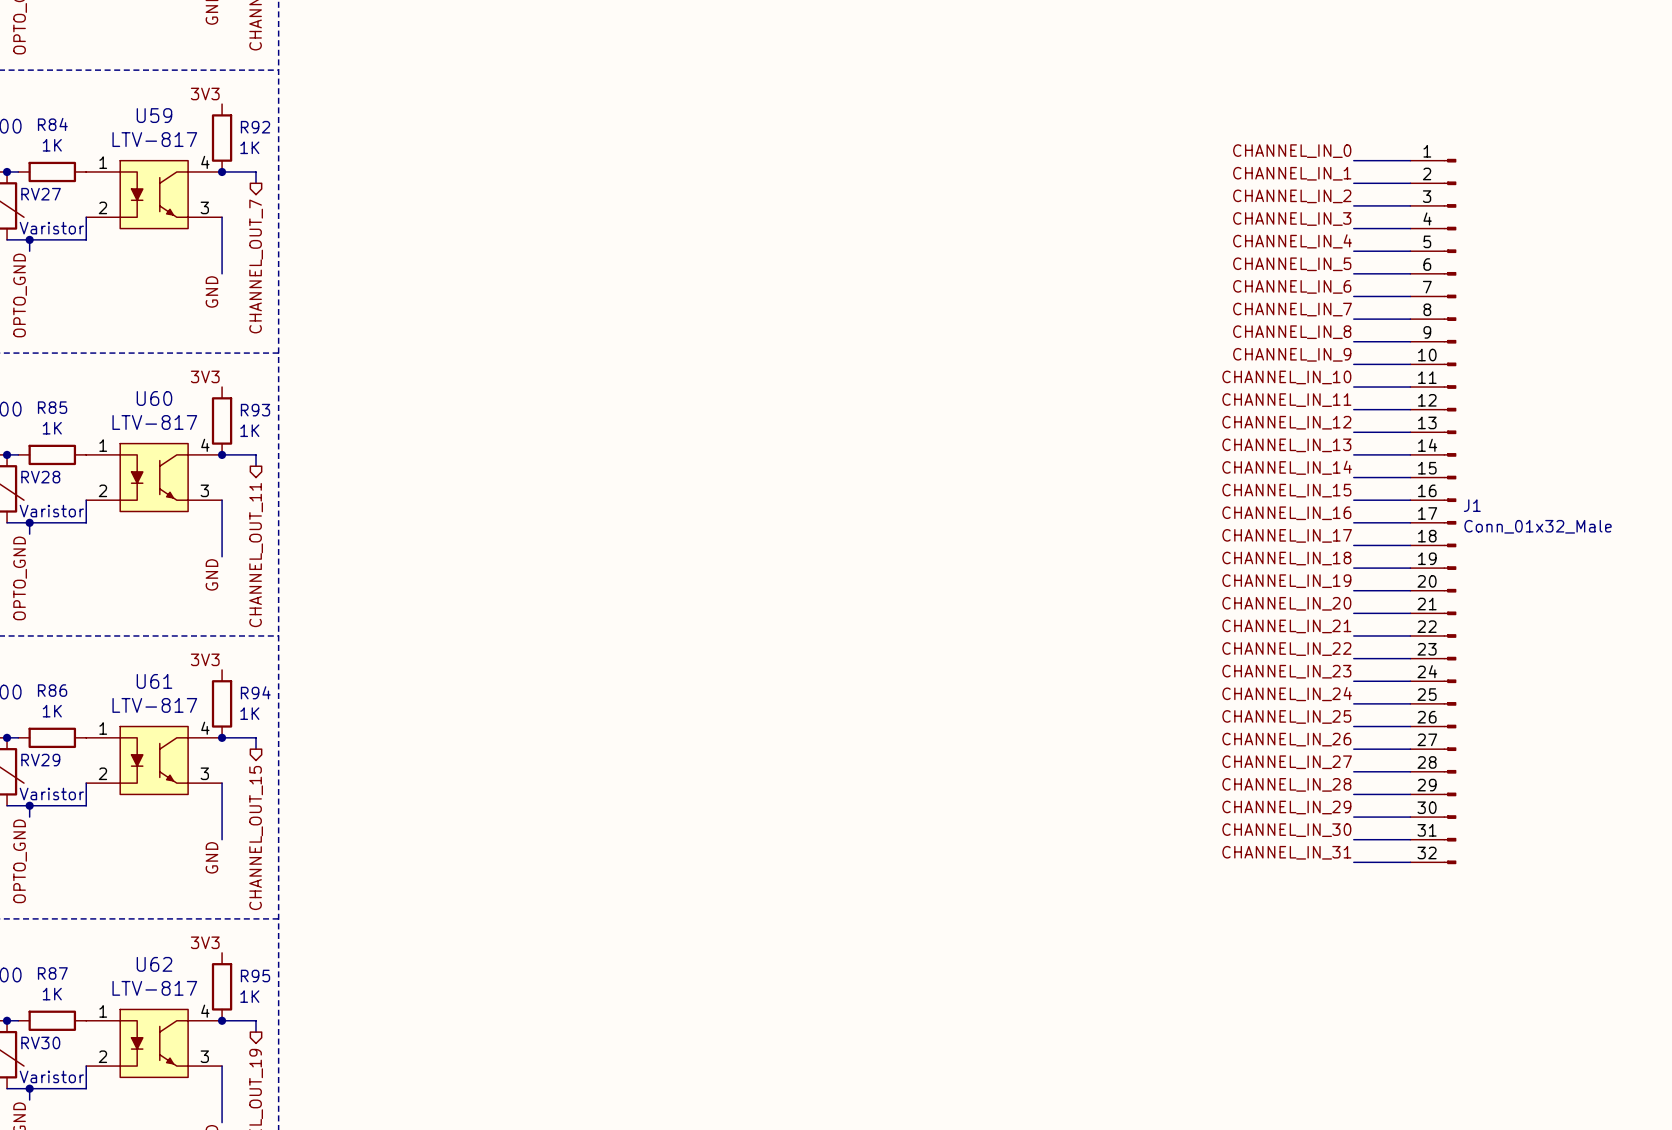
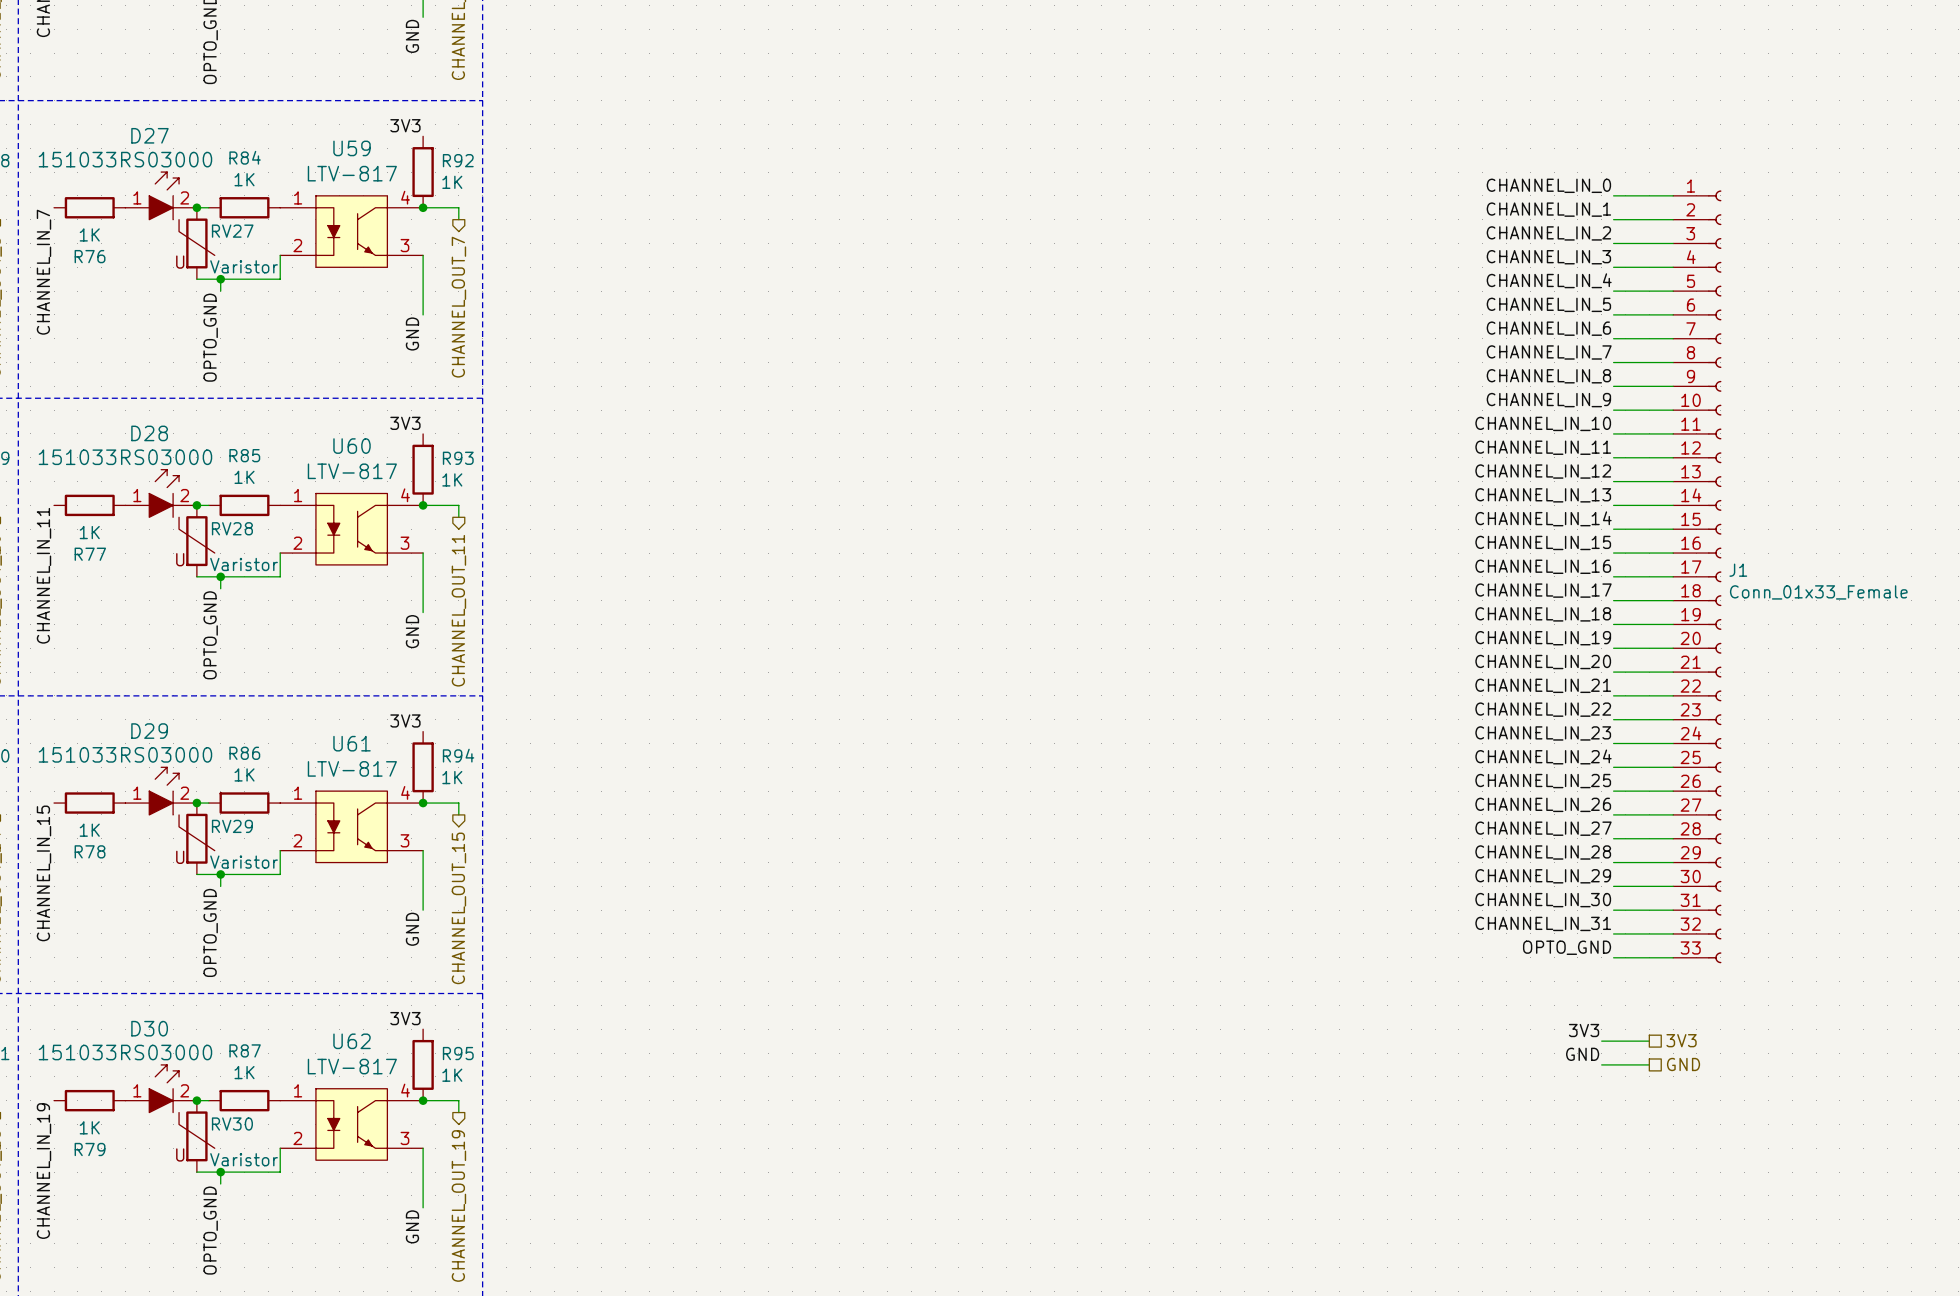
J1 symbol: [1410, 158, 1457, 865] -> [1673, 190, 1722, 964]
J1 value: Conn_01x32_Male (1538, 526) -> Conn_01x33_Female (1818, 592)
label: none -> OPTO_GND (1567, 947)
wire: none -> (1613, 957) (1673, 957)
label: none -> 3V3 (1584, 1030)
hierarchical label: none -> 3V3 (1681, 1040)
wire: none -> (1601, 1041) (1649, 1041)
label: none -> GND (1582, 1054)
wire: none -> (1601, 1064) (1649, 1064)
hierarchical label: none -> GND (1683, 1064)

